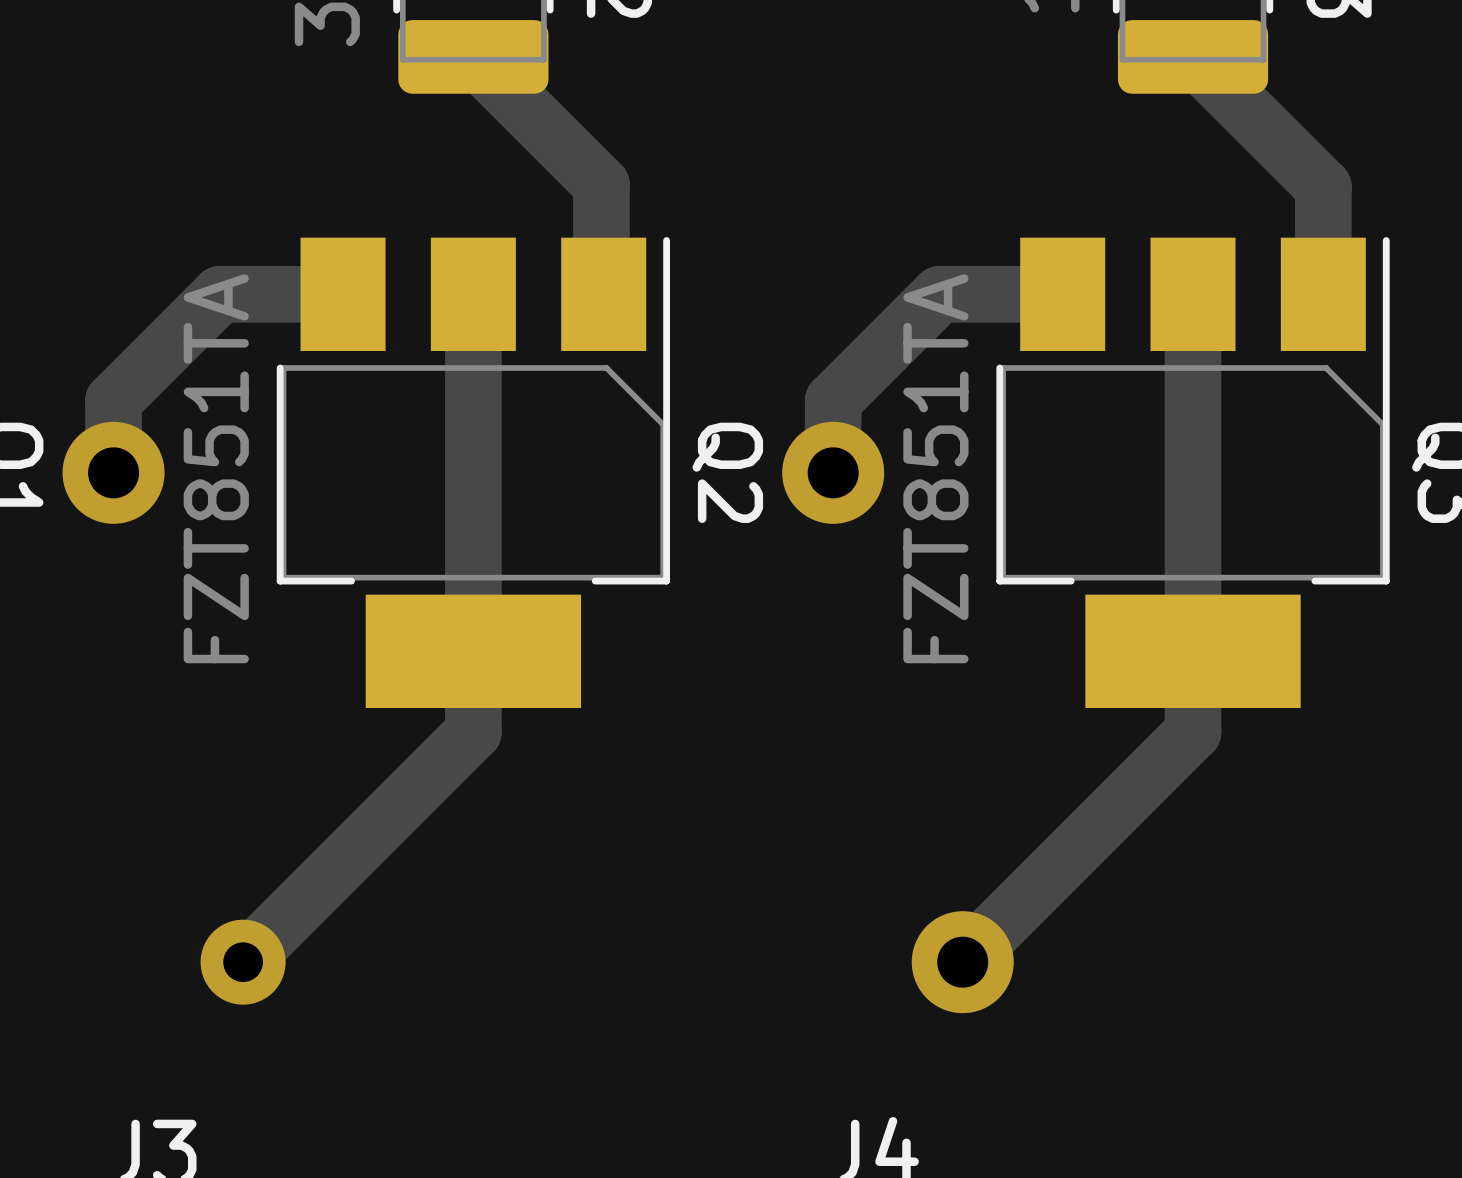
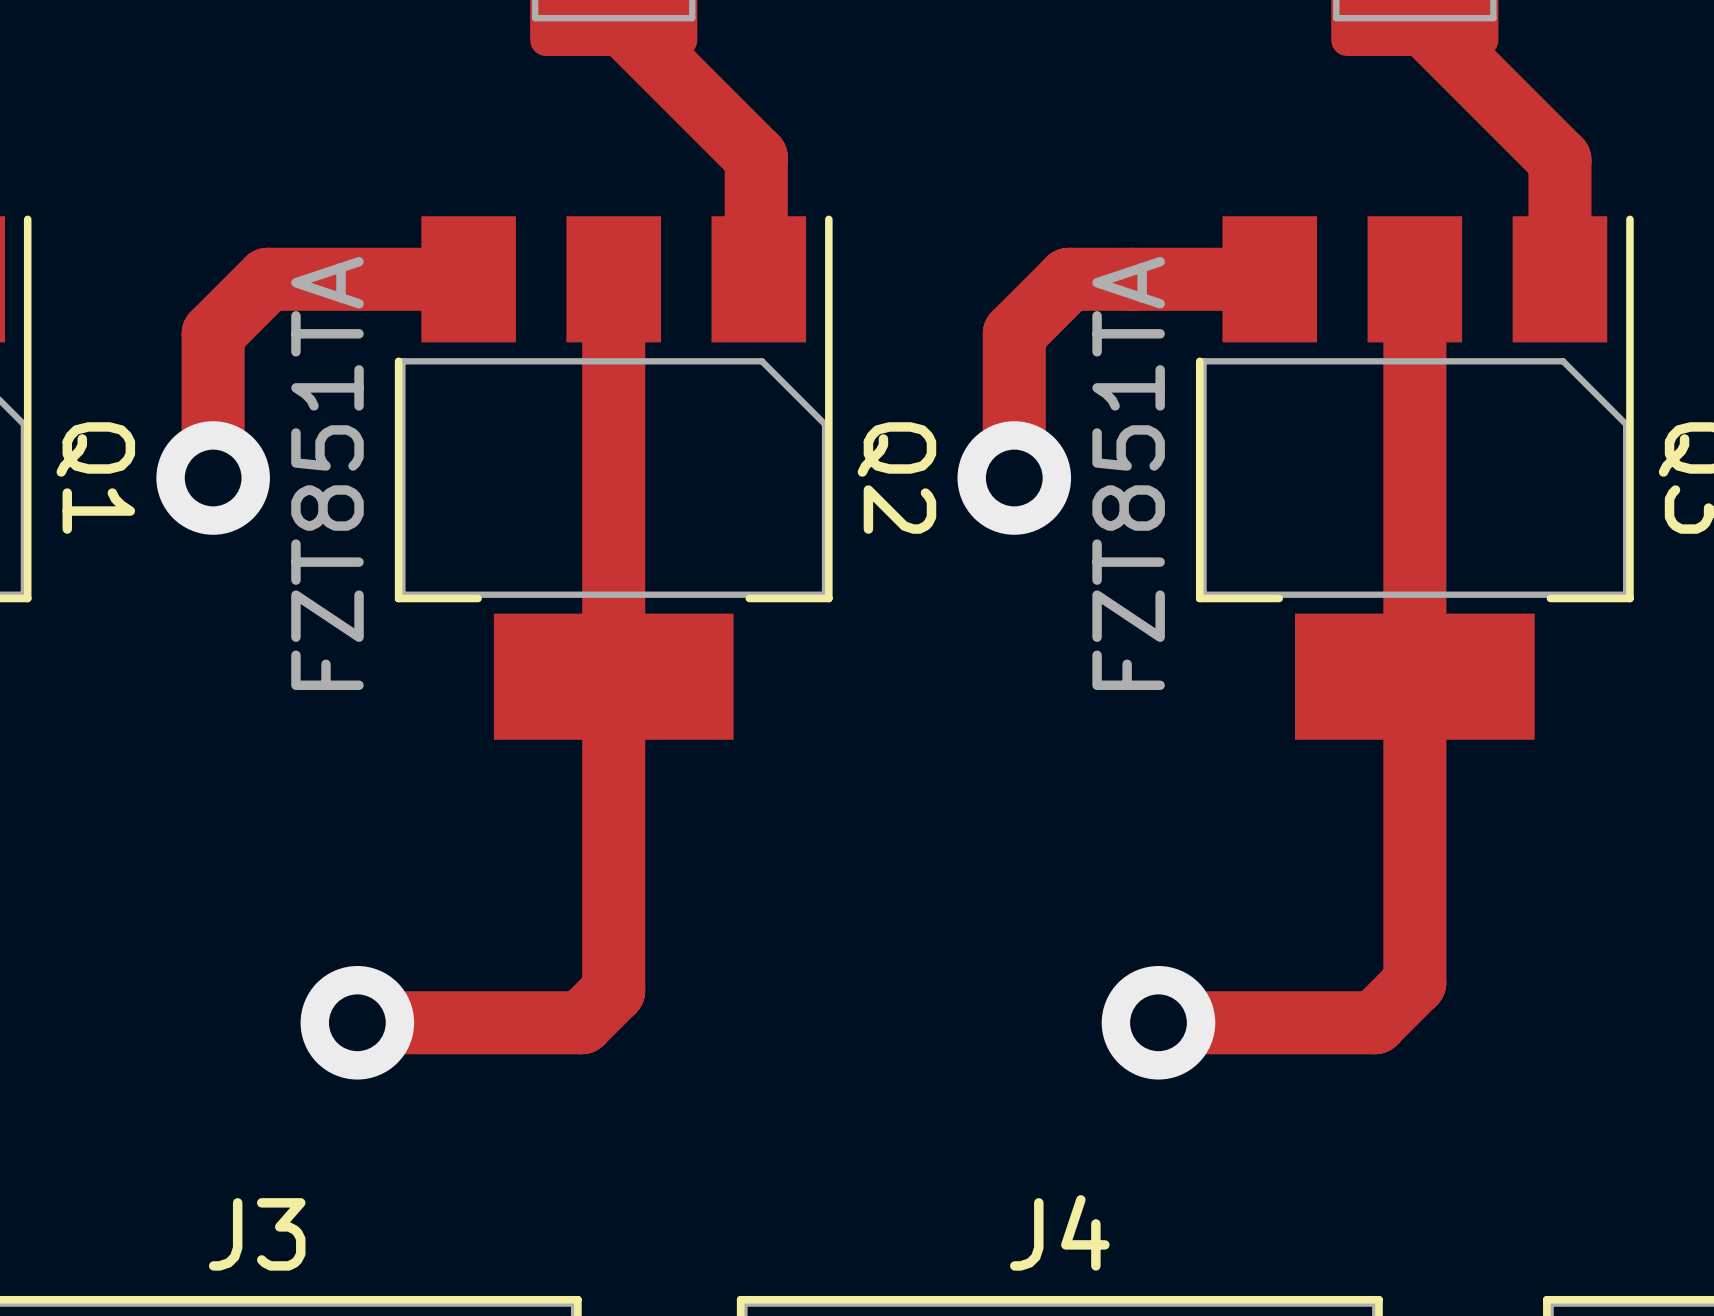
track: (220, 294) (113, 400) -> (331, 279) (267, 279) (213, 333) (213, 397)
track: (939, 294) (833, 400) -> (1132, 279) (1068, 279) (1014, 333) (1014, 397)
track: (473, 731) (243, 962) -> (613, 766) (613, 990) (581, 1022) (357, 1022)
track: (1193, 731) (962, 962) -> (1414, 766) (1414, 982) (1374, 1022) (1158, 1022)
via size: [200, 919, 286, 1005] -> [300, 966, 415, 1080]

